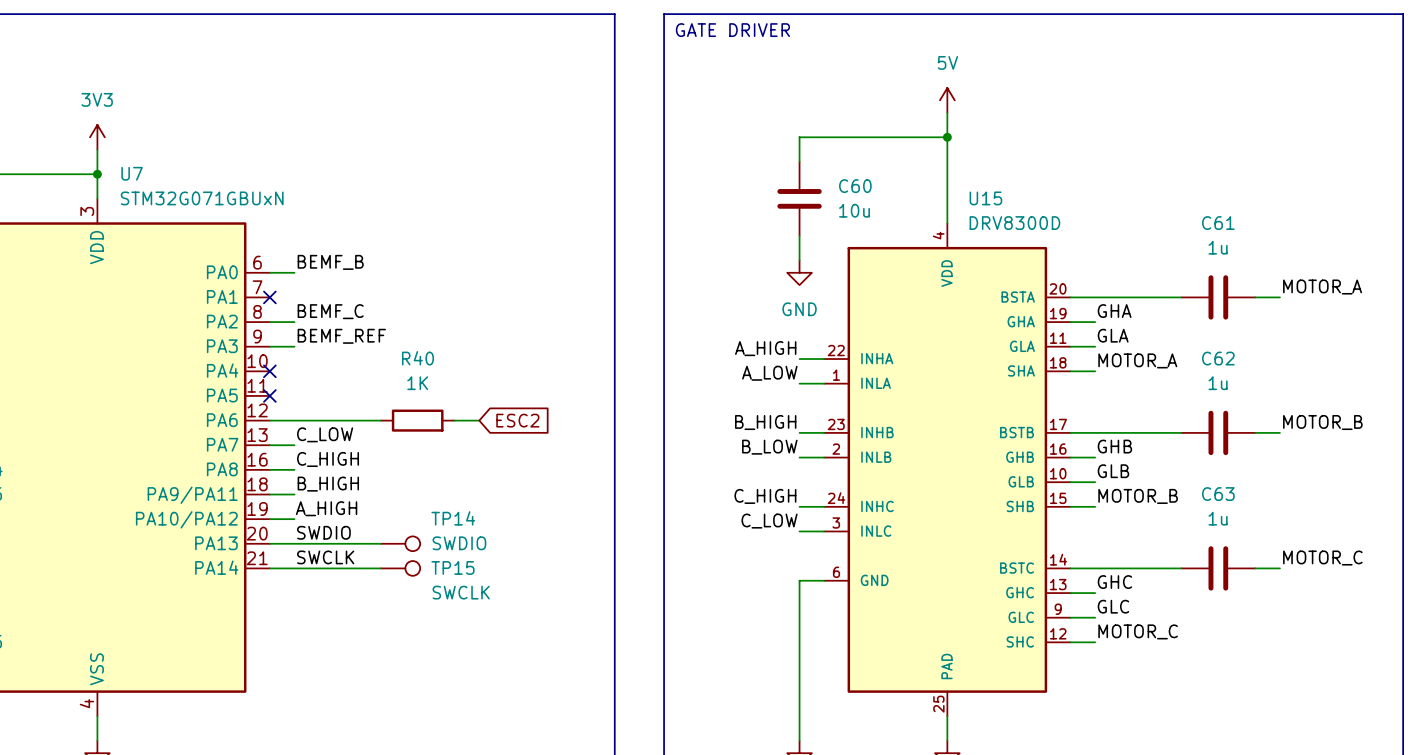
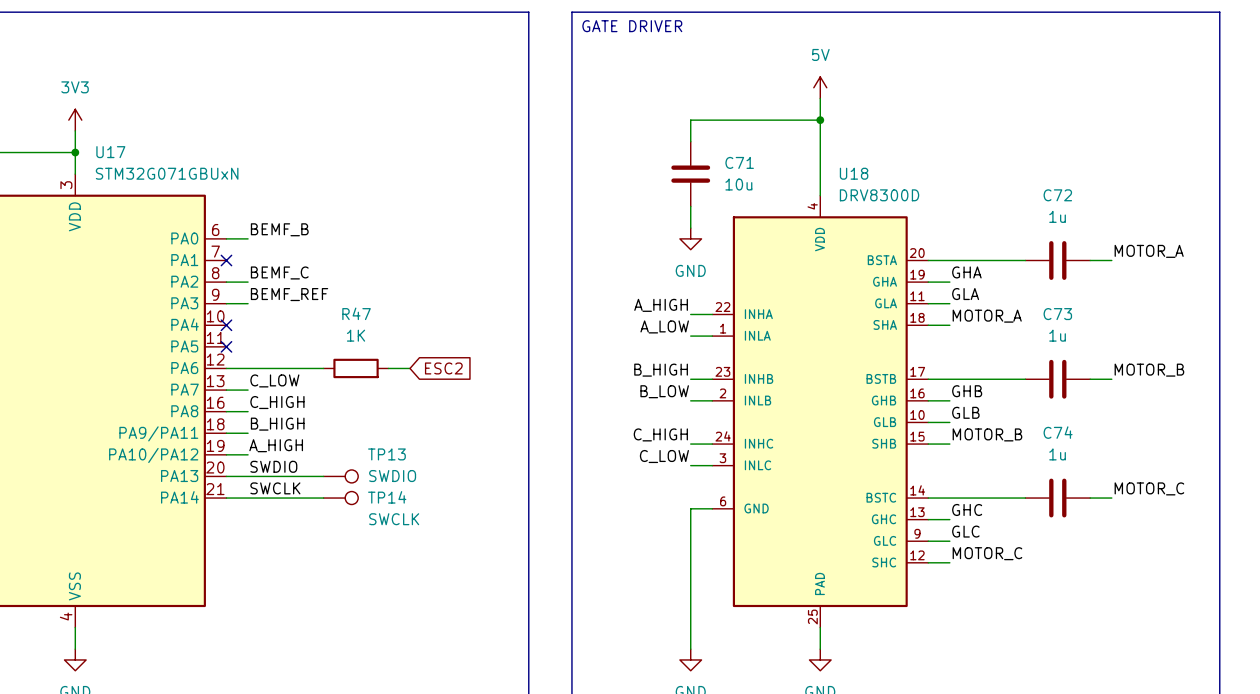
U7 name: U7 (132, 173) -> U17 (110, 152)
C60 name: C60 (855, 186) -> C71 (739, 162)
U15 name: U15 (985, 198) -> U18 (854, 173)
C61 name: C61 (1218, 223) -> C72 (1057, 195)
R40 name: R40 (417, 358) -> R47 (356, 313)
C62 name: C62 (1218, 358) -> C73 (1057, 314)
C63 name: C63 (1218, 494) -> C74 (1058, 432)
TP14 name: TP14 (453, 518) -> TP13 (386, 454)
TP15 name: TP15 (452, 567) -> TP14 (387, 497)

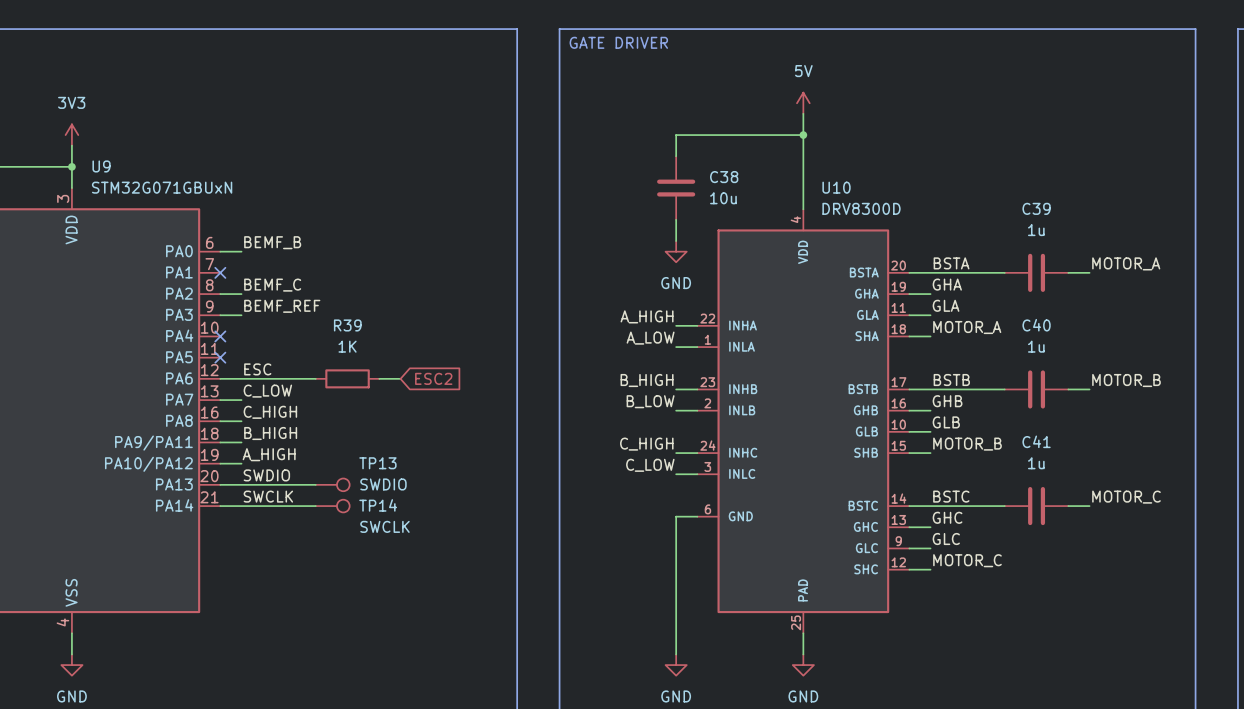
U17 name: U17 (110, 152) -> U9 (101, 166)
C71 name: C71 (739, 162) -> C38 (724, 177)
U18 name: U18 (854, 173) -> U10 (836, 187)
C72 name: C72 (1057, 195) -> C39 (1036, 208)
label: none -> BSTA (951, 263)
R47 name: R47 (356, 313) -> R39 (347, 325)
C73 name: C73 (1057, 314) -> C40 (1036, 325)
label: none -> ESC (257, 369)
label: none -> BSTB (951, 380)
C74 name: C74 (1058, 432) -> C41 (1036, 441)
label: none -> BSTC (951, 496)

